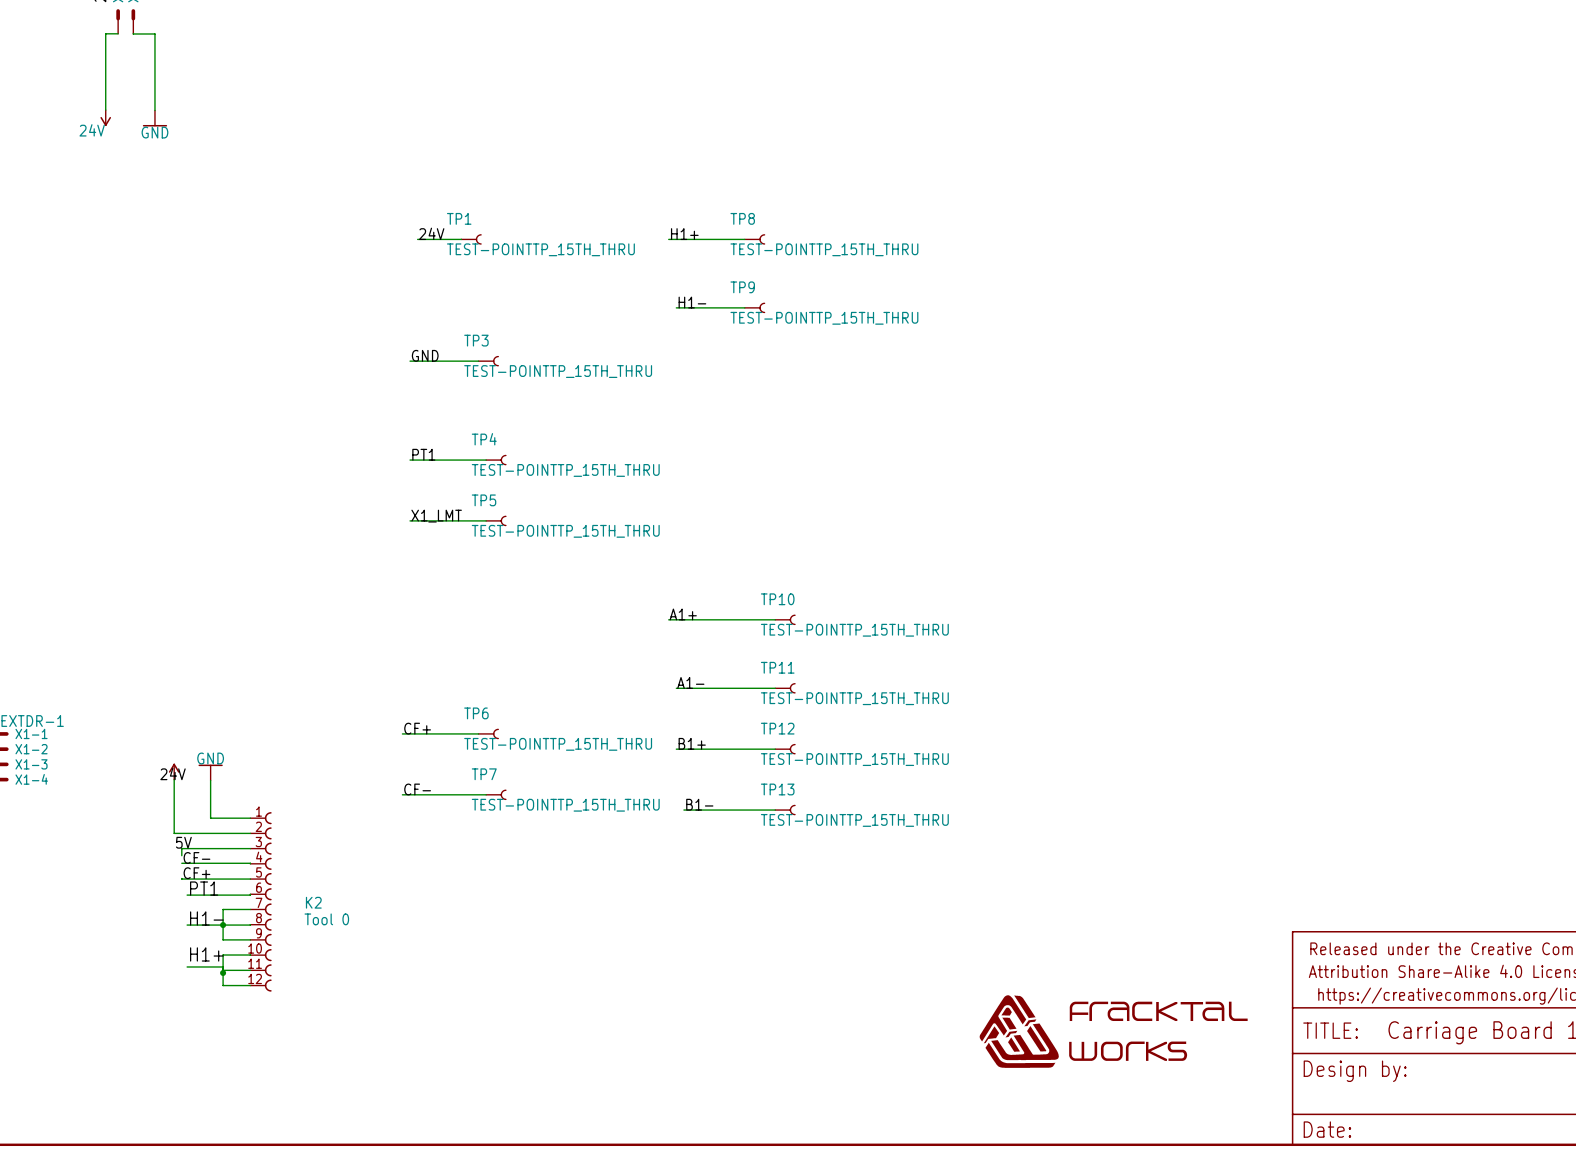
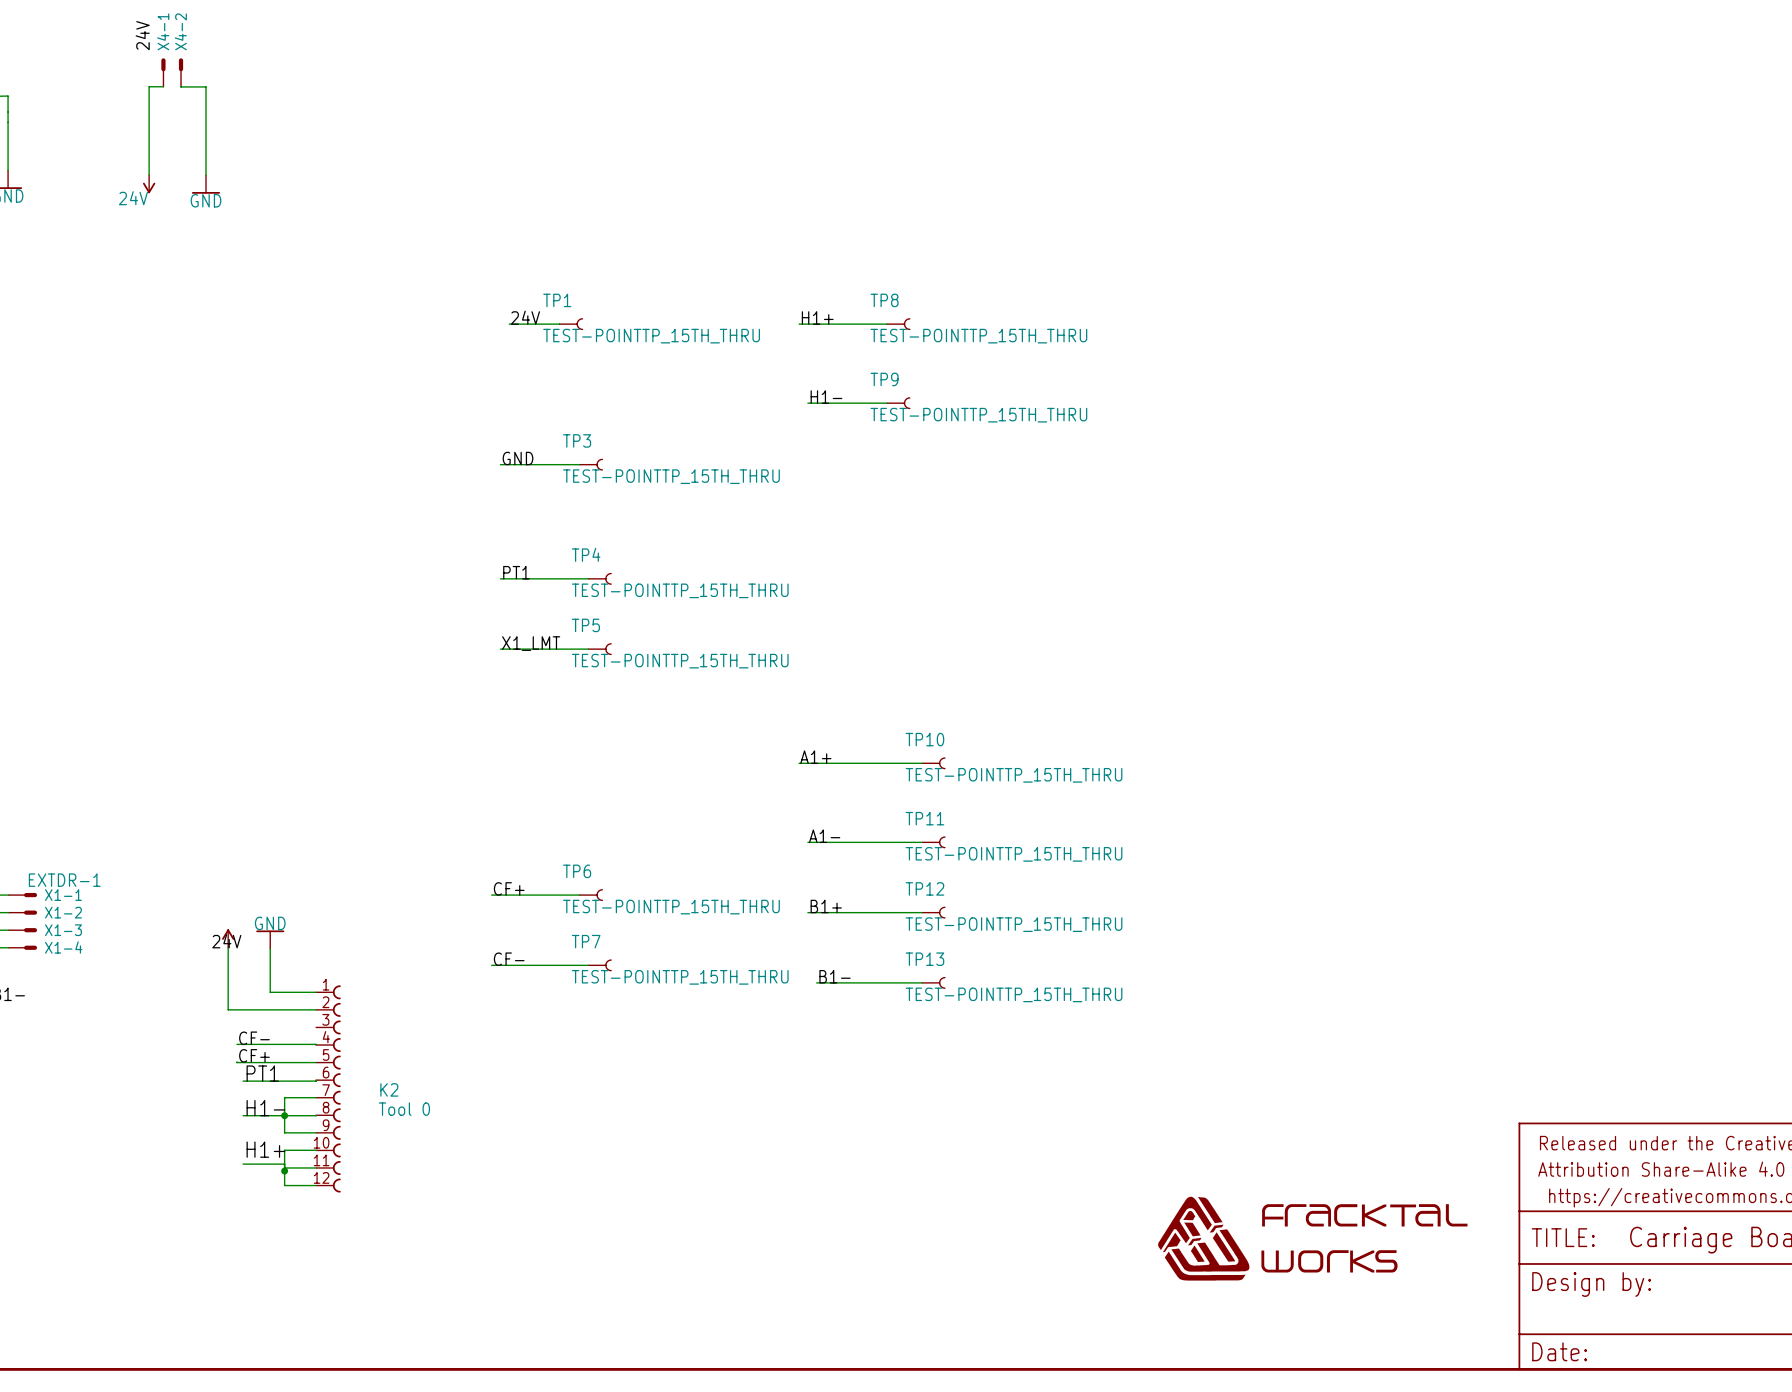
label: 5V (183, 842) -> none
wire: (250, 848) (181, 848) (181, 855) -> none

